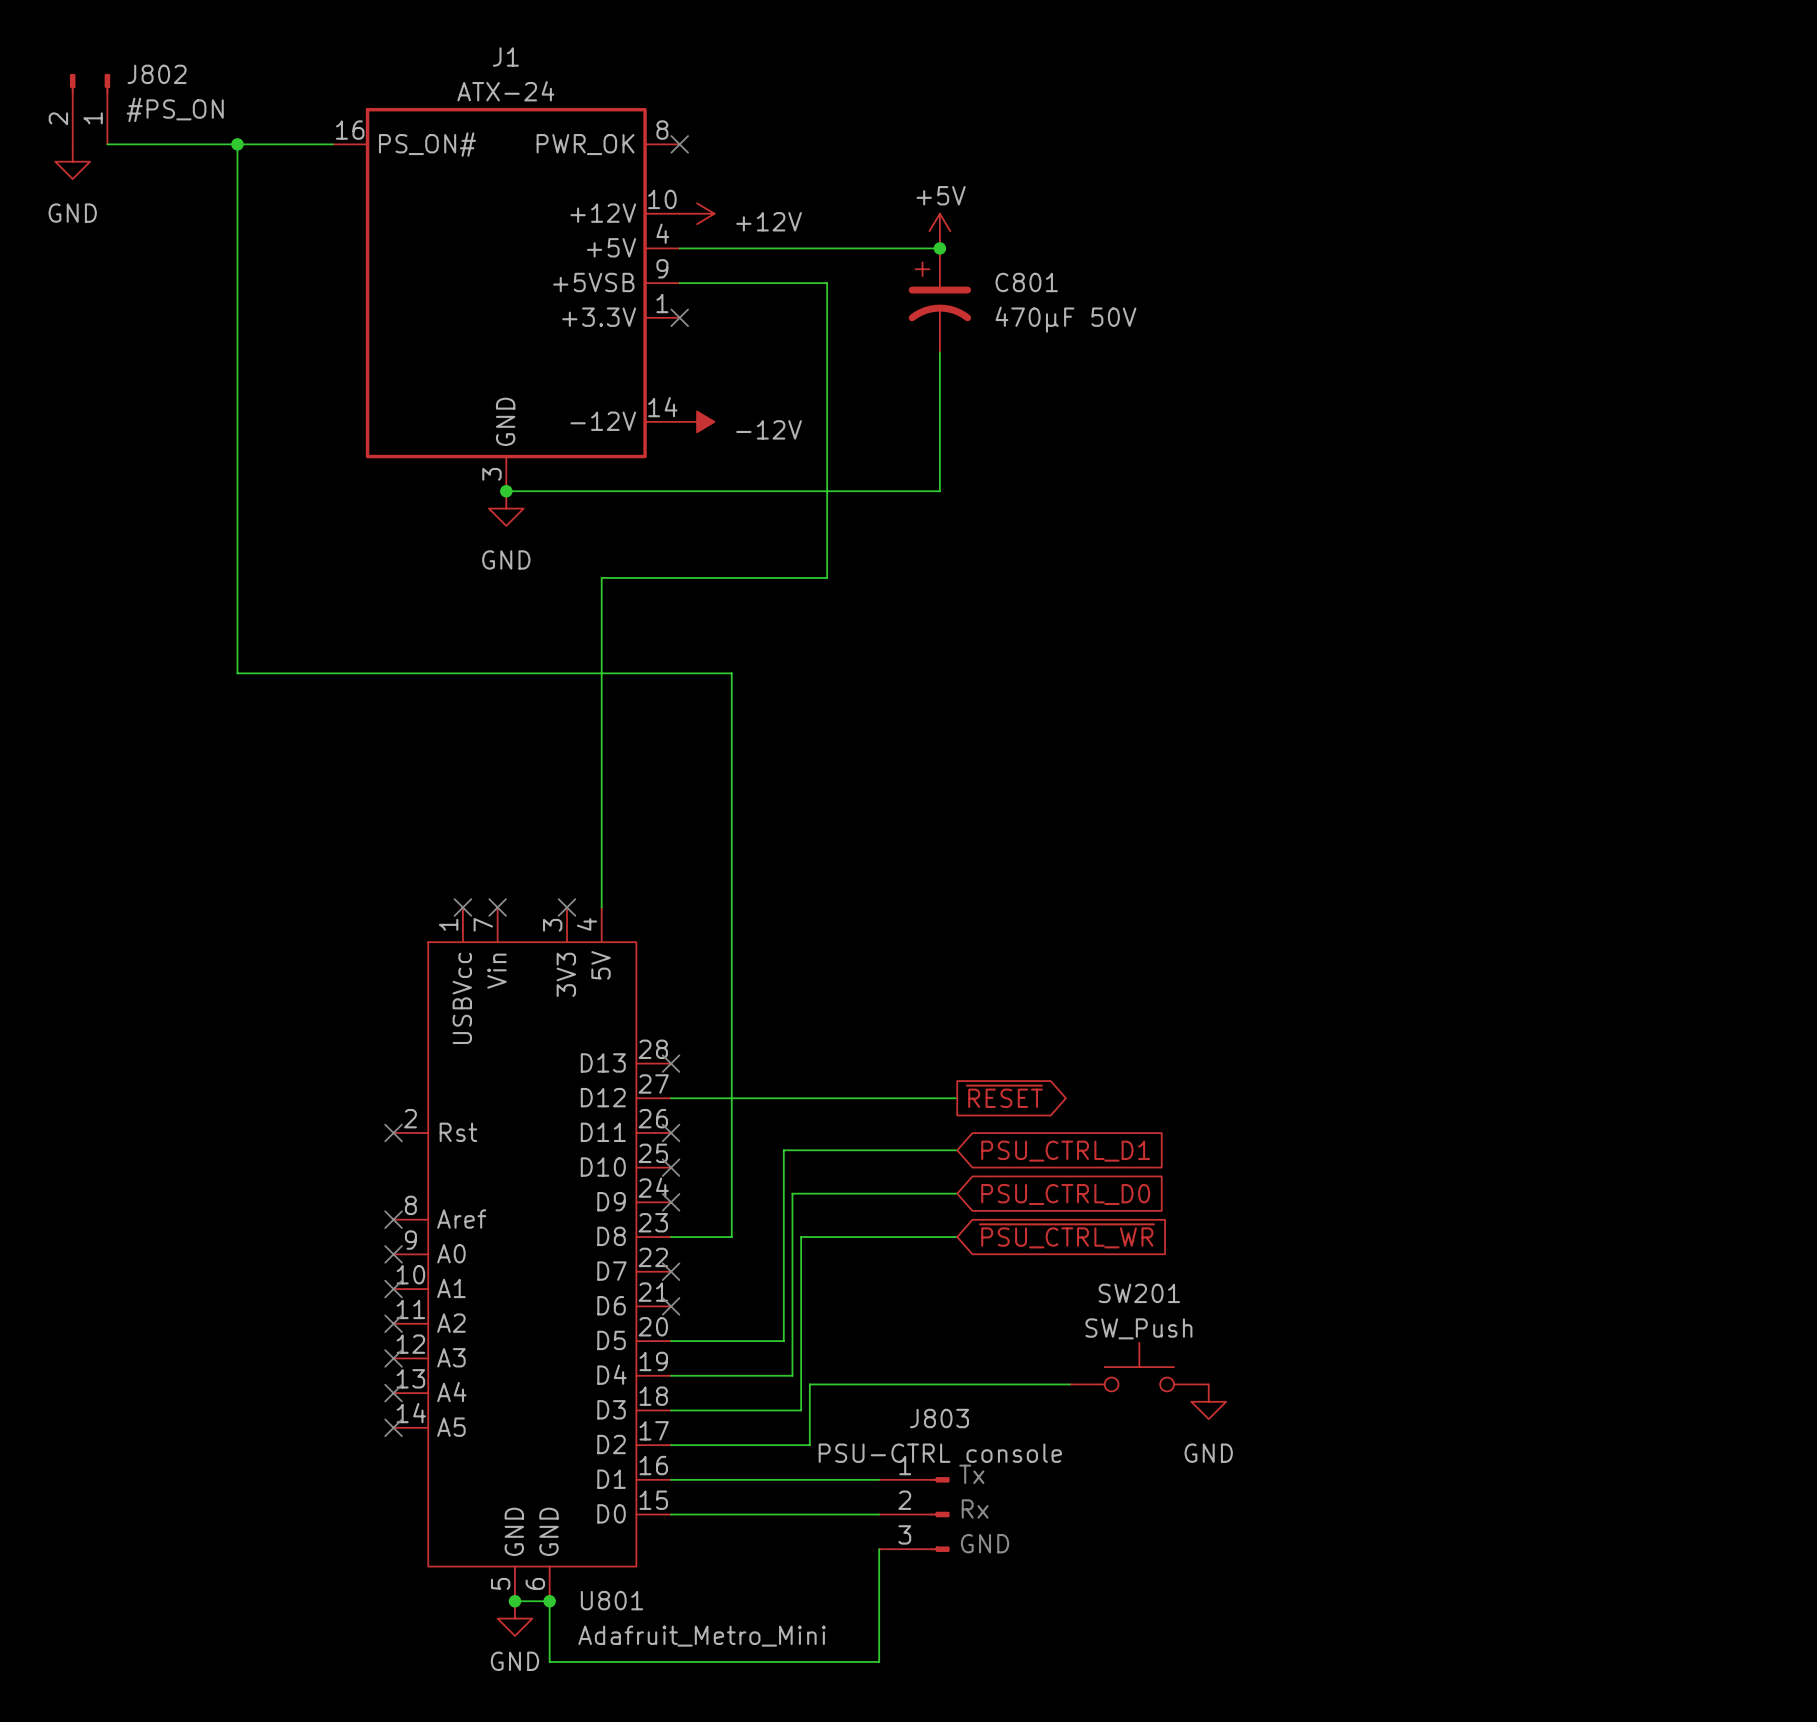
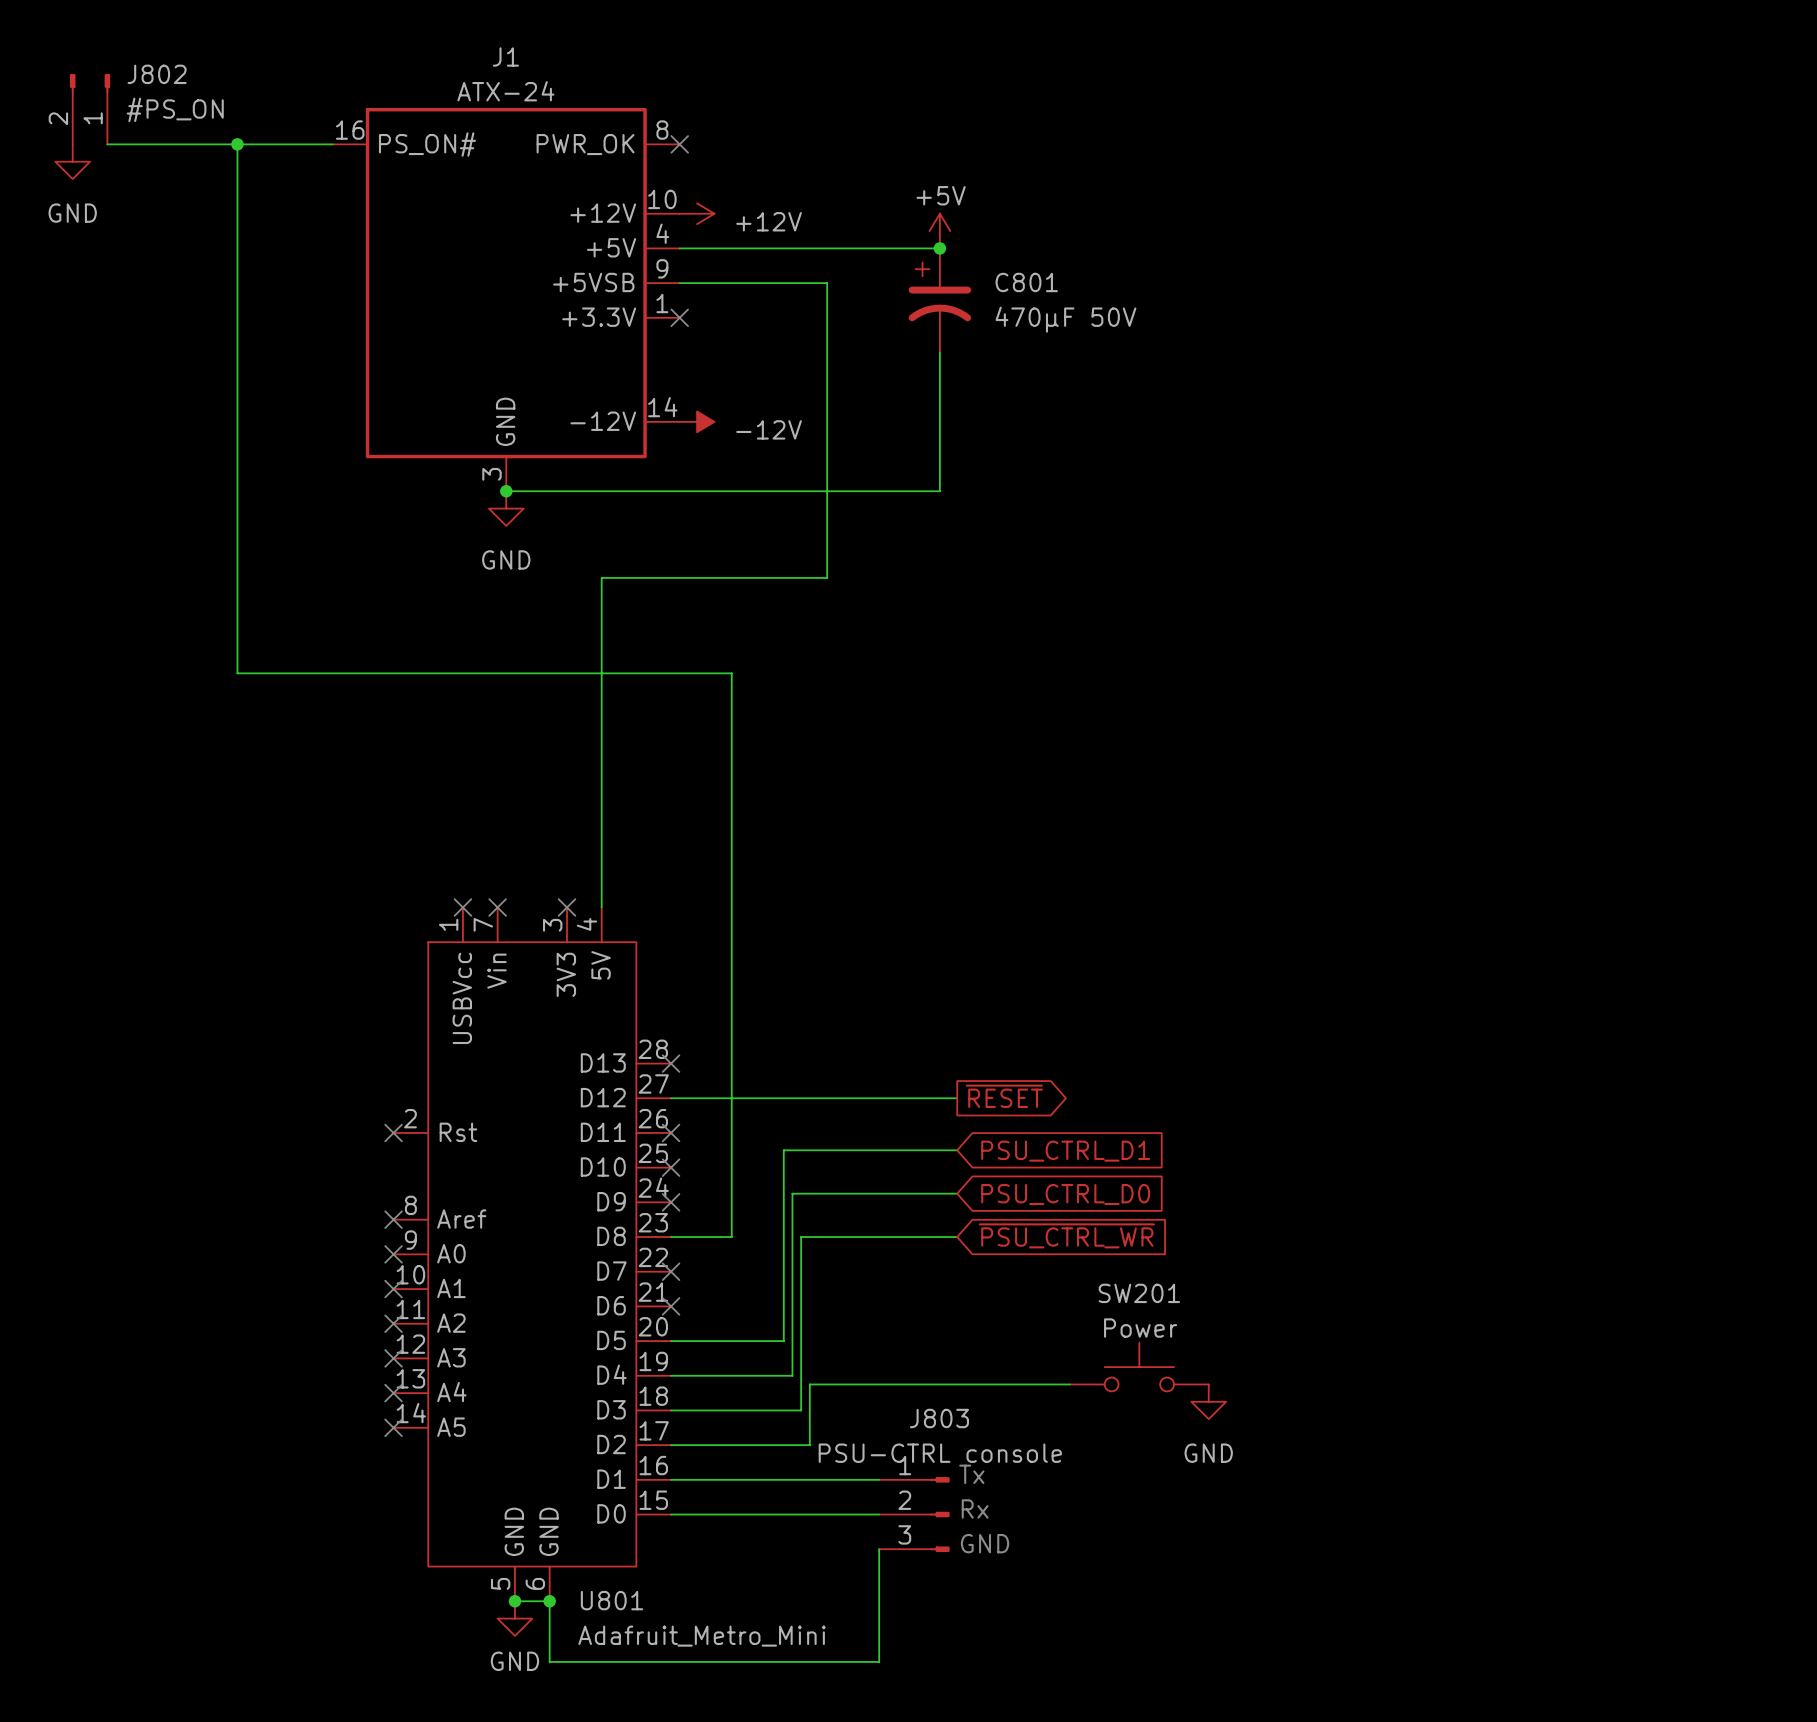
SW201 value: SW_Push (1138, 1328) -> Power (1140, 1328)

